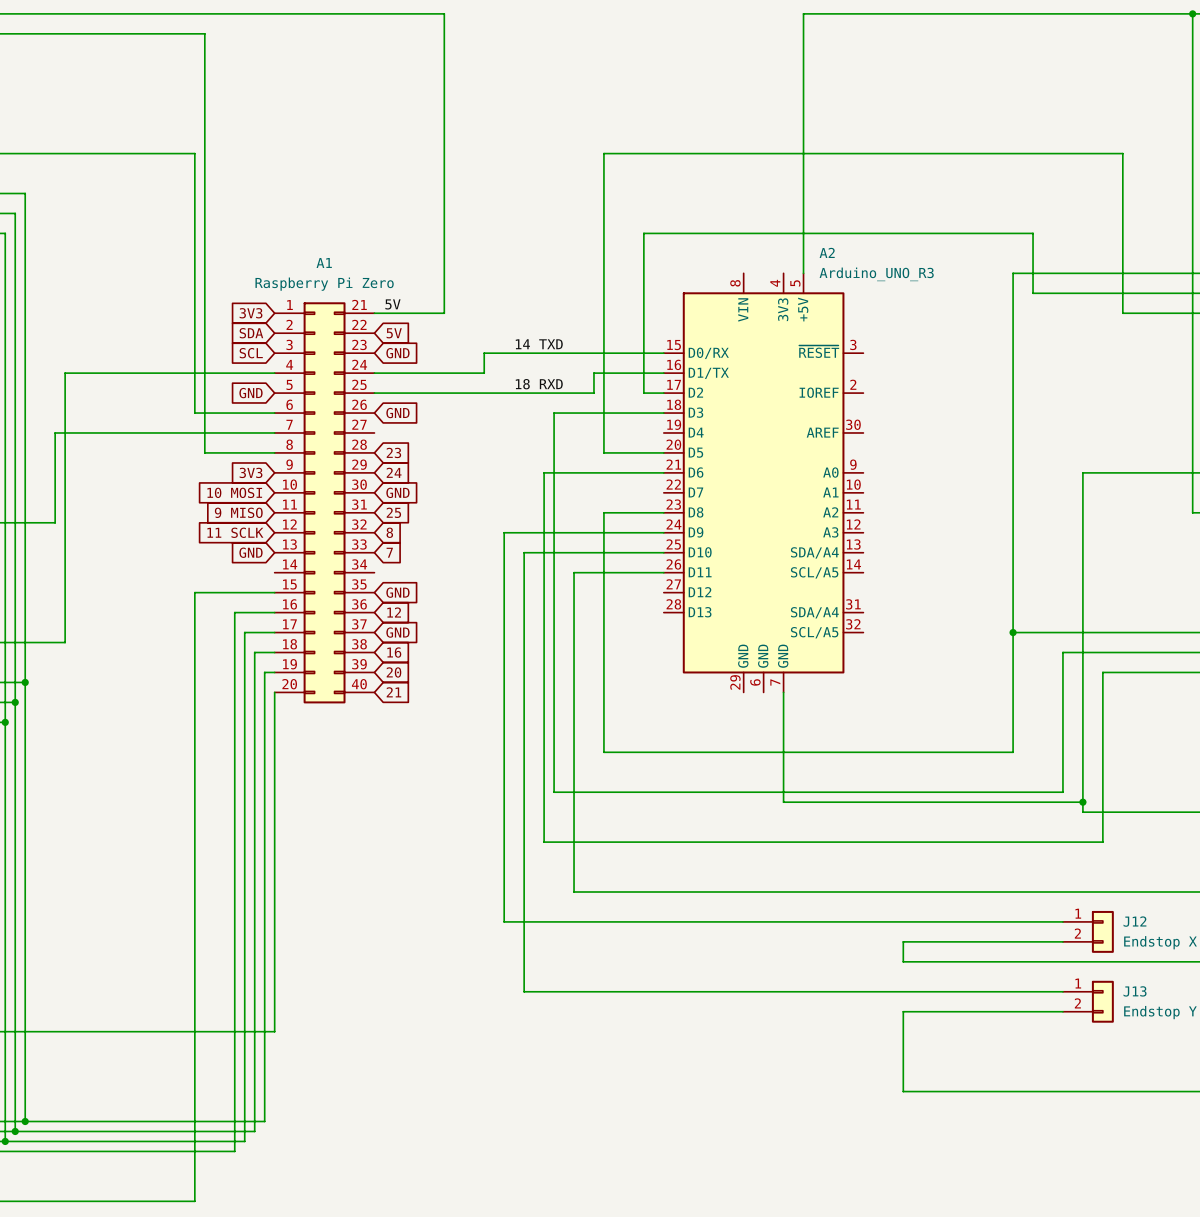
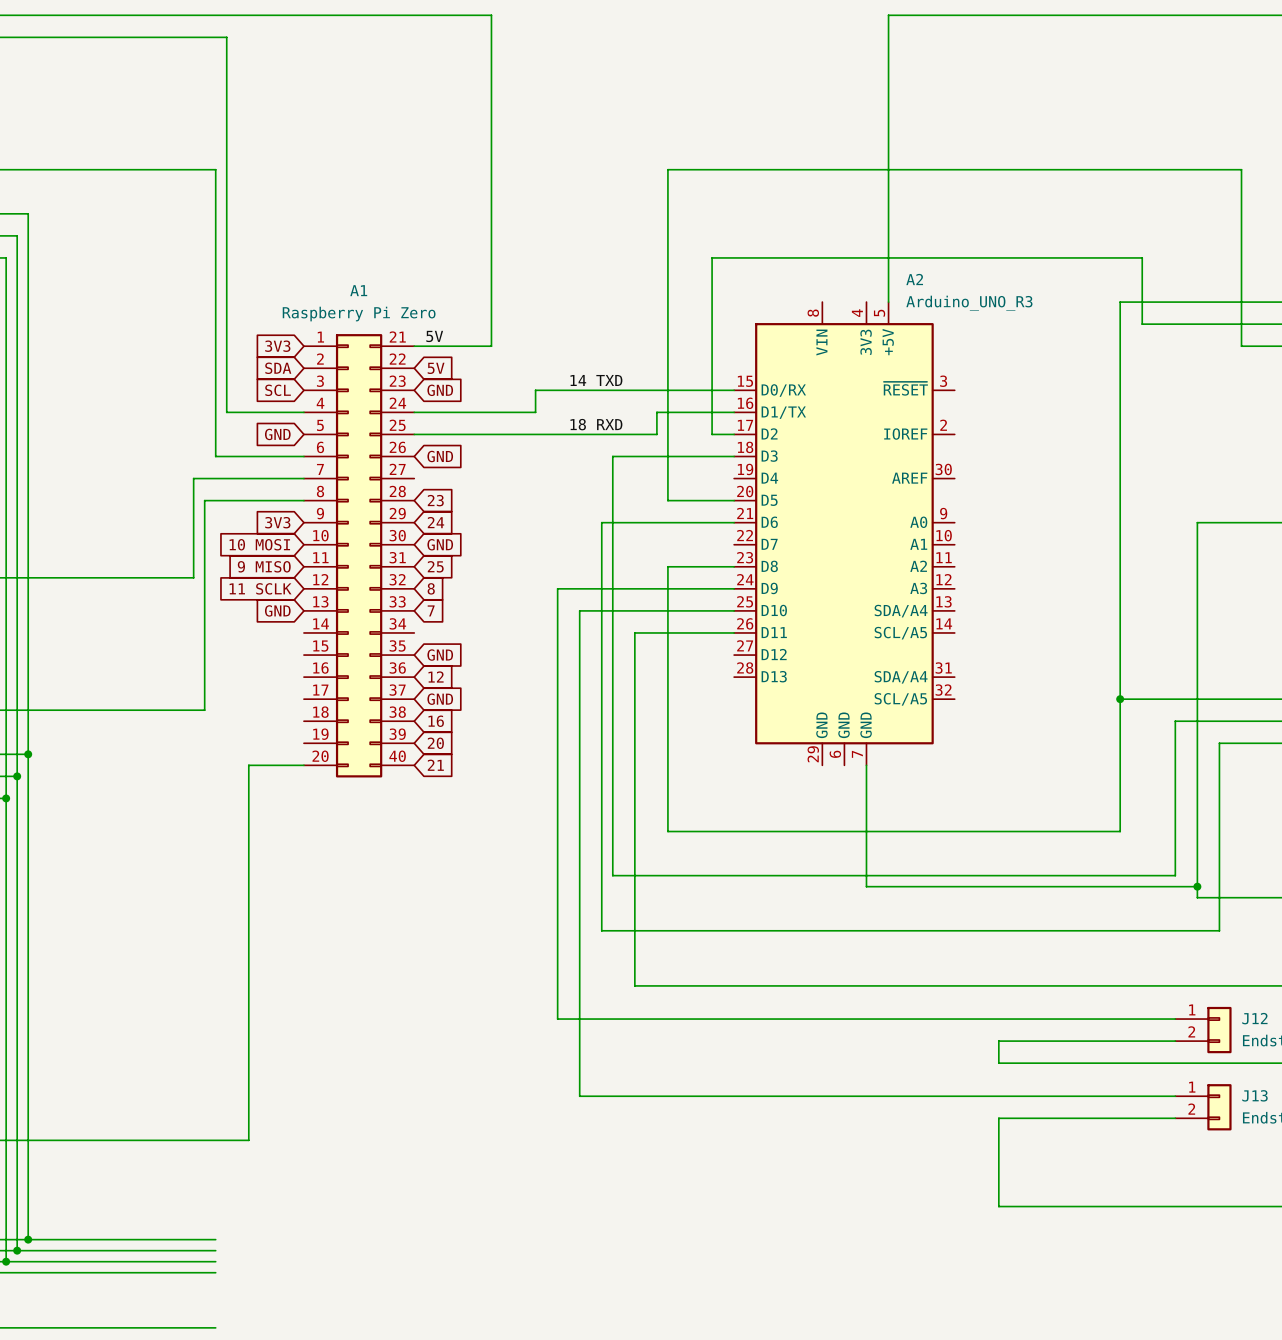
wire: (174, 432) (55, 432) (55, 522) -> (193, 478) (193, 577) (61, 577)
wire: (204, 452) (204, 373) (65, 373) (65, 642) -> (226, 500) (204, 500) (204, 710) (72, 710)
wire: (274, 592) (194, 592) (194, 1201) -> none
wire: (274, 612) (234, 612) (234, 1151) (194, 1151) -> none
wire: (274, 632) (244, 632) (244, 1141) (194, 1141) -> none
wire: (274, 652) (254, 652) (254, 1131) (194, 1131) -> none
wire: (274, 672) (264, 672) (264, 1121) (194, 1121) -> none
wire: (274, 692) (274, 1031) (224, 1031) -> (303, 765) (248, 765) (248, 1140)

